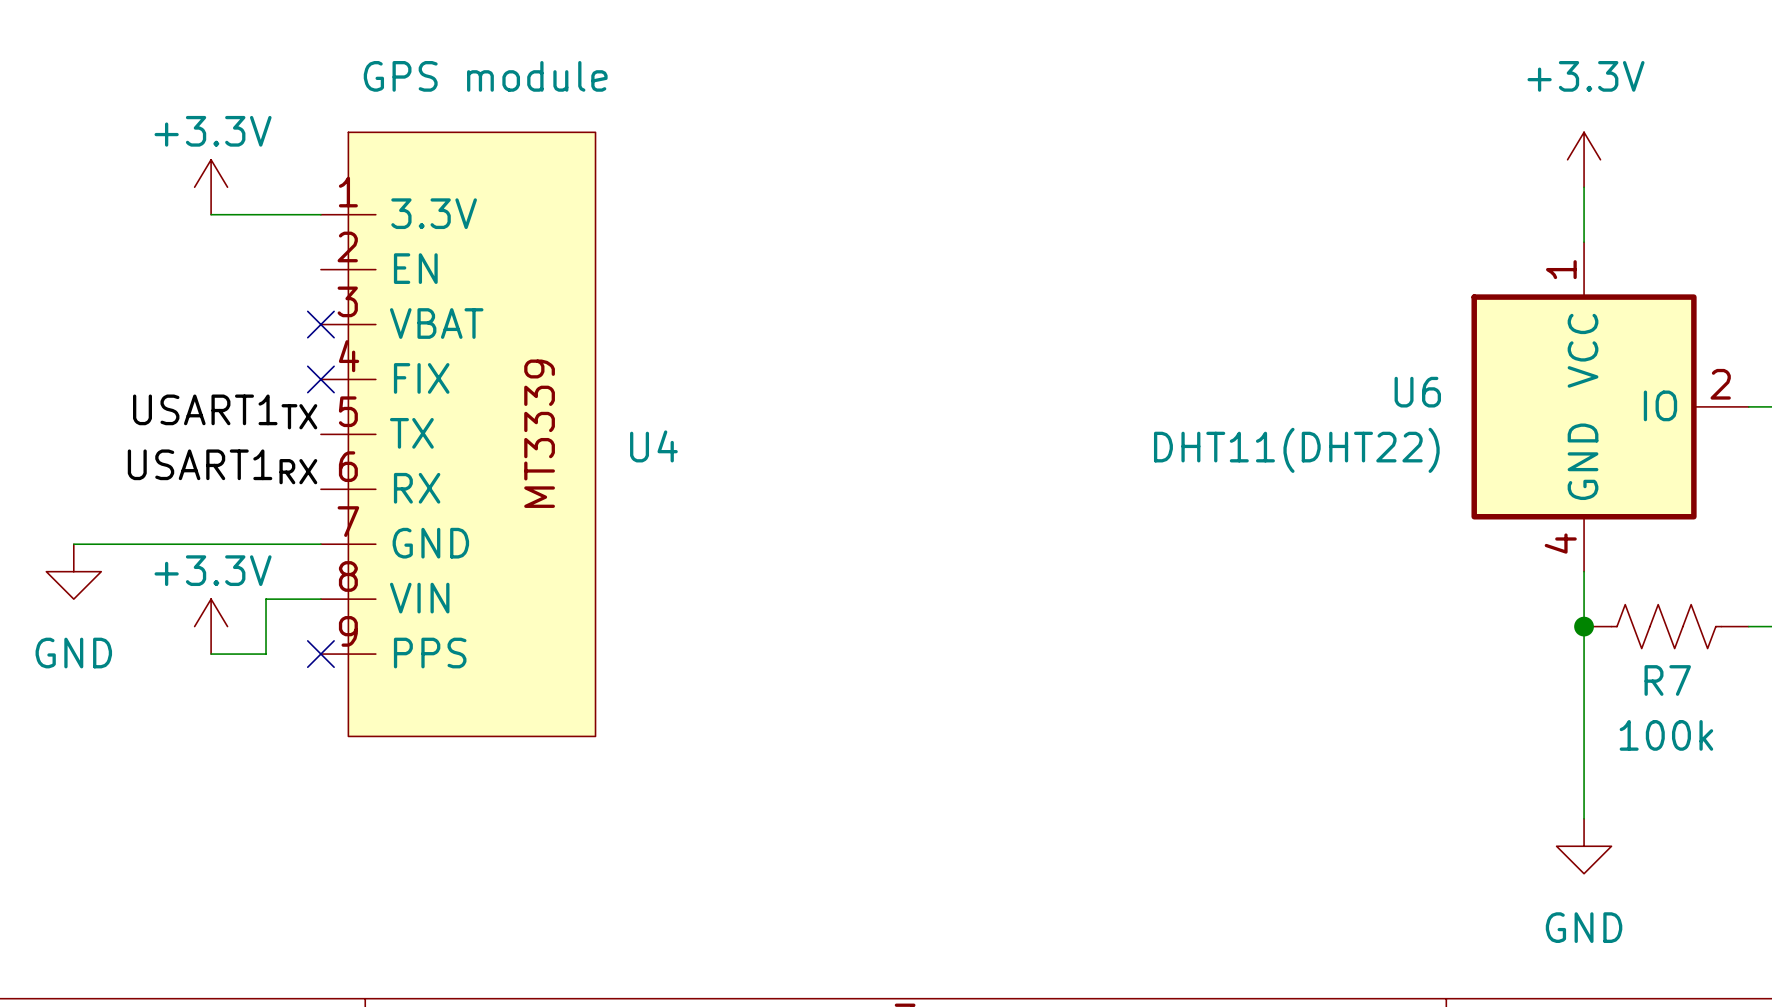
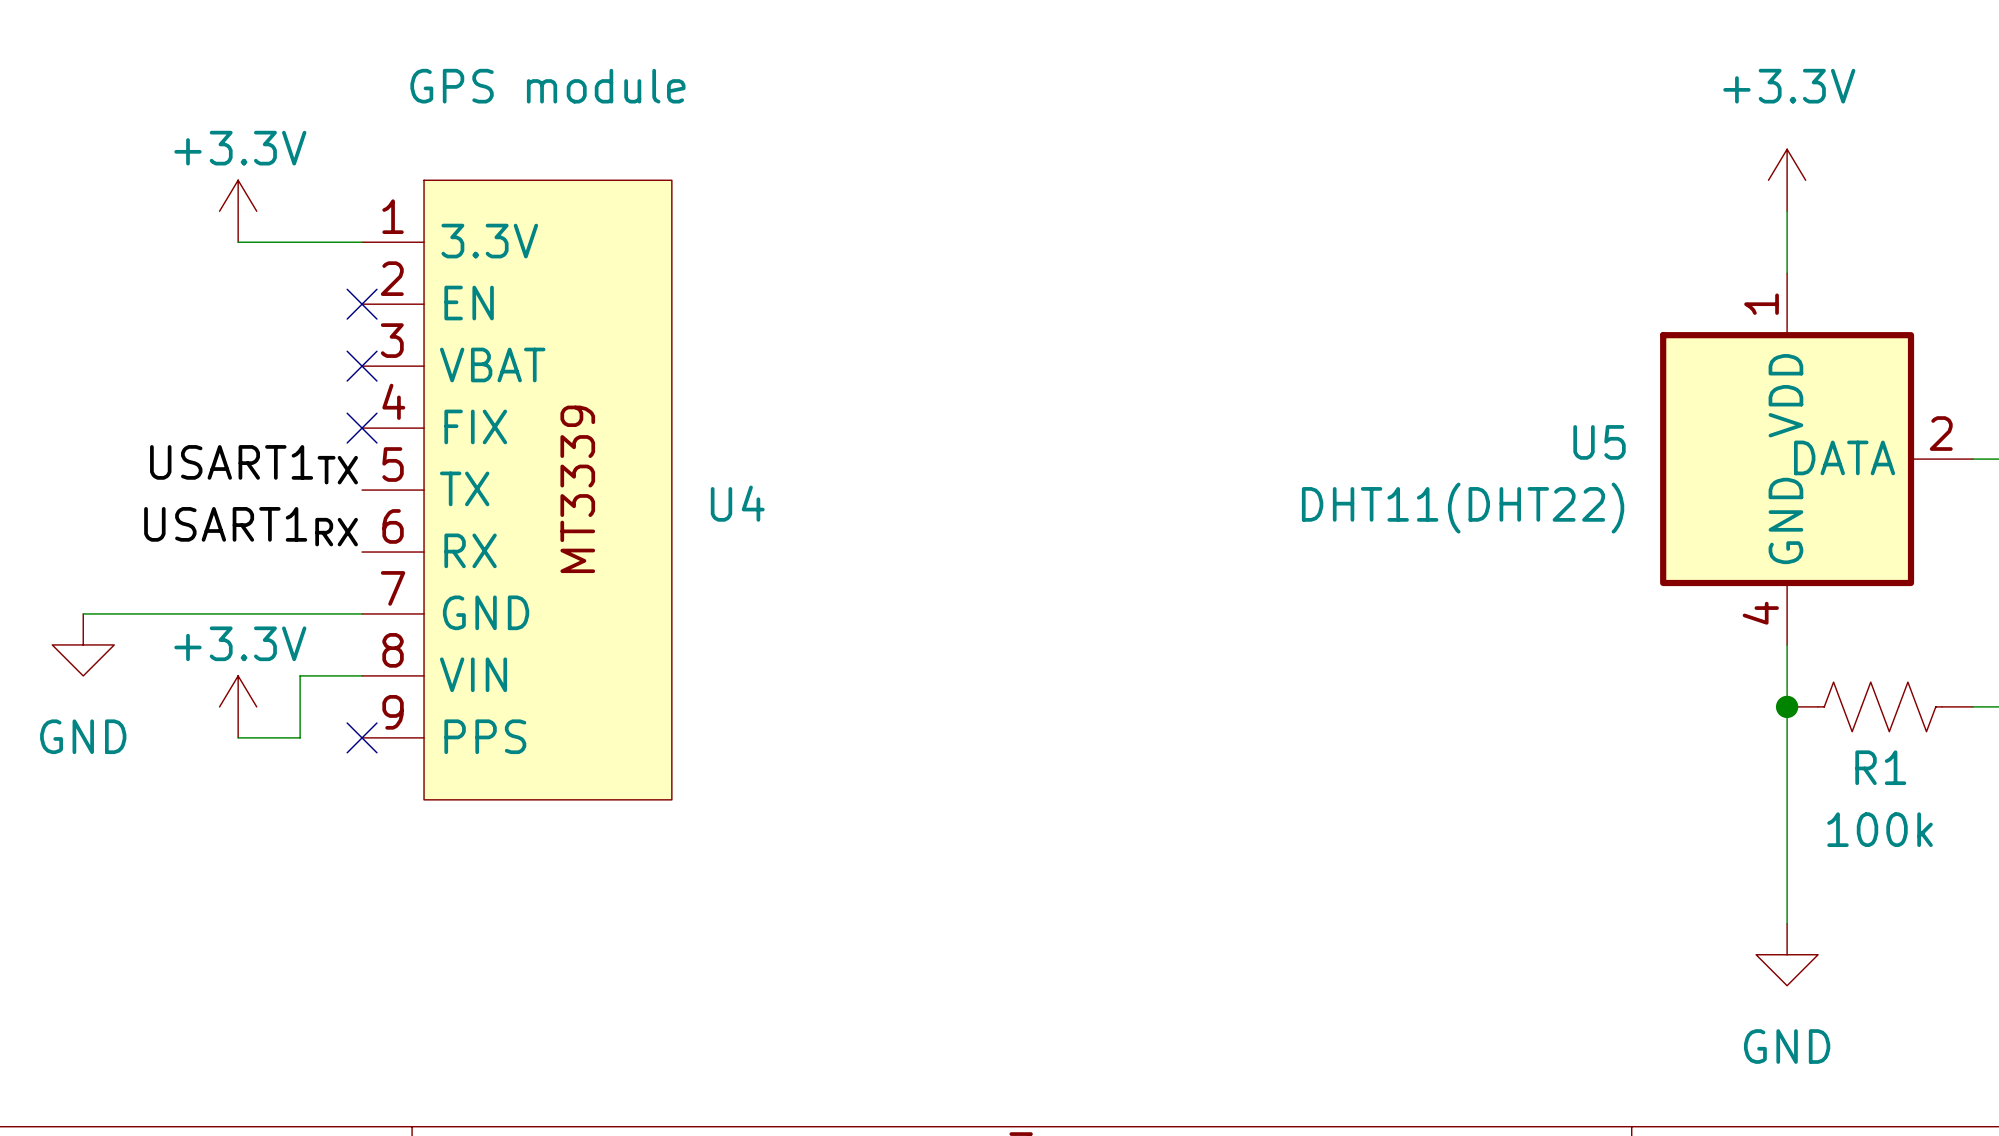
U4 symbol: [320, 132, 596, 737] -> [362, 180, 672, 800]
no-connect mark: none -> (362, 304)
U6 pin name: VCC (1583, 350) -> VDD (1785, 395)
U6 name: U6 (1417, 392) -> U5 (1599, 442)
U6 pin name: IO (1660, 405) -> DATA (1844, 457)
R7 name: R7 (1667, 680) -> R1 (1880, 767)

